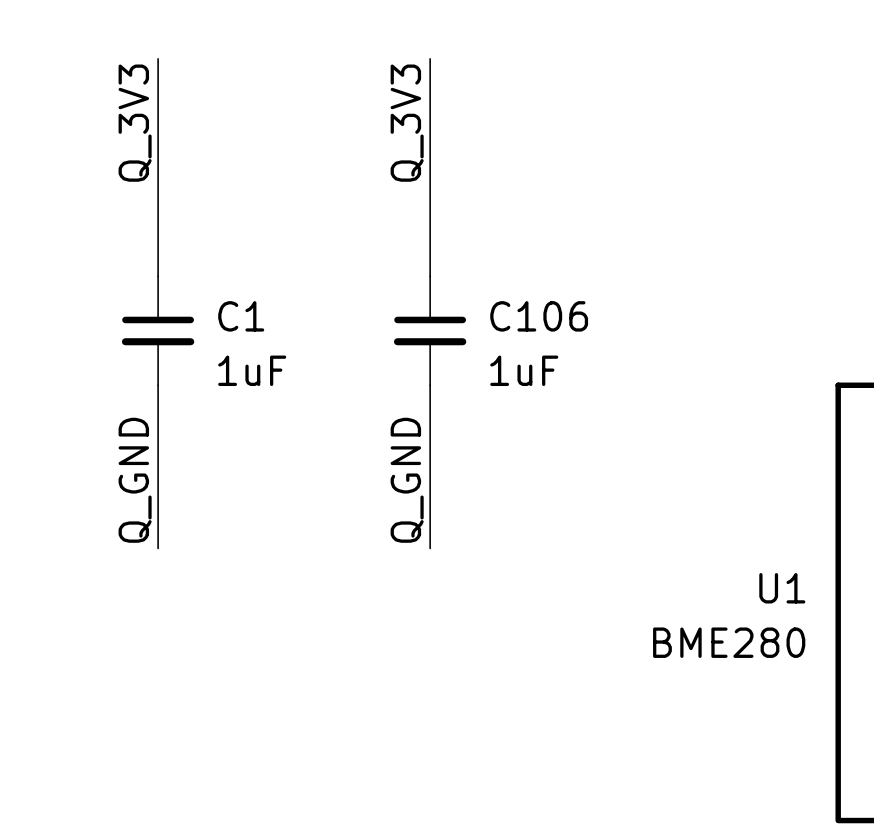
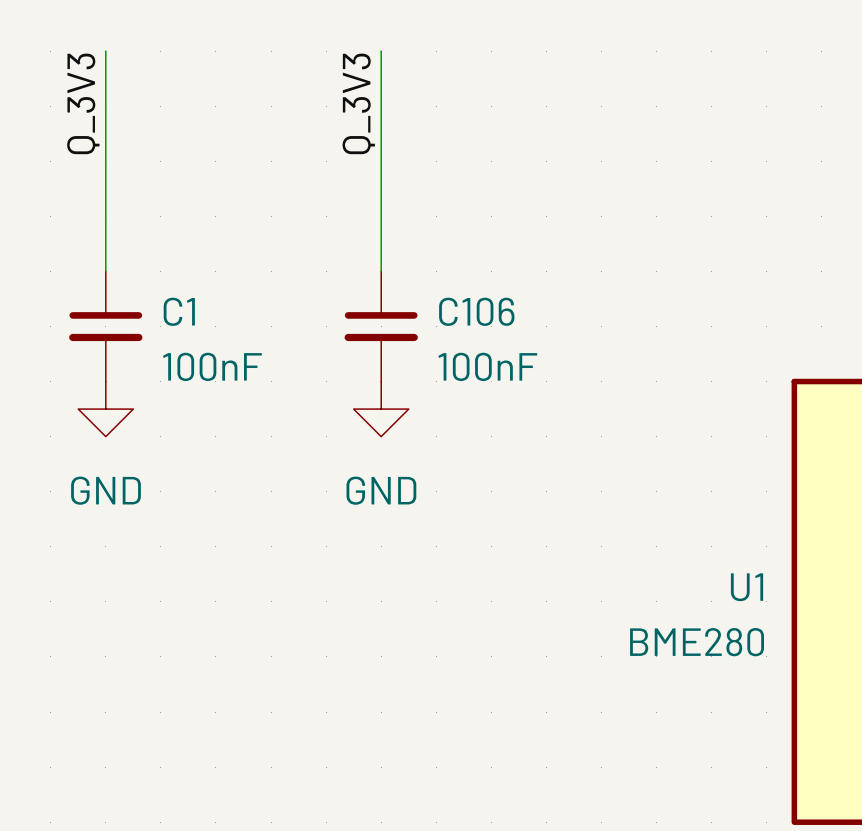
C1 value: 1uF (252, 370) -> 100nF (212, 366)
C106 value: 1uF (524, 370) -> 100nF (487, 366)
wire: (158, 385) (158, 548) -> none
wire: (430, 385) (430, 548) -> none
power symbol: none -> GND (105, 409)
power symbol: none -> GND (381, 409)
label: Q_GND (135, 480) -> none
label: Q_GND (407, 480) -> none

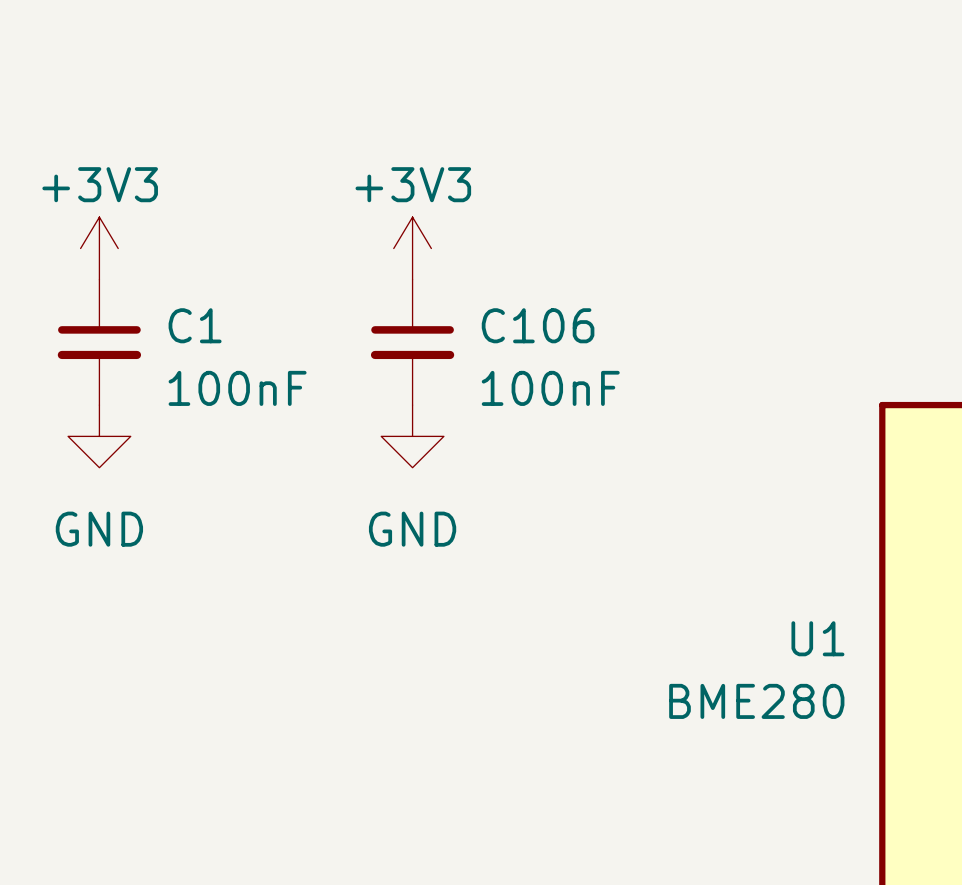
wire: (105, 51) (105, 271) -> none
wire: (381, 51) (381, 271) -> none
label: Q_3V3 (83, 103) -> none
label: Q_3V3 (358, 103) -> none
power symbol: none -> +3V3 (99, 248)
power symbol: none -> +3V3 (412, 248)

